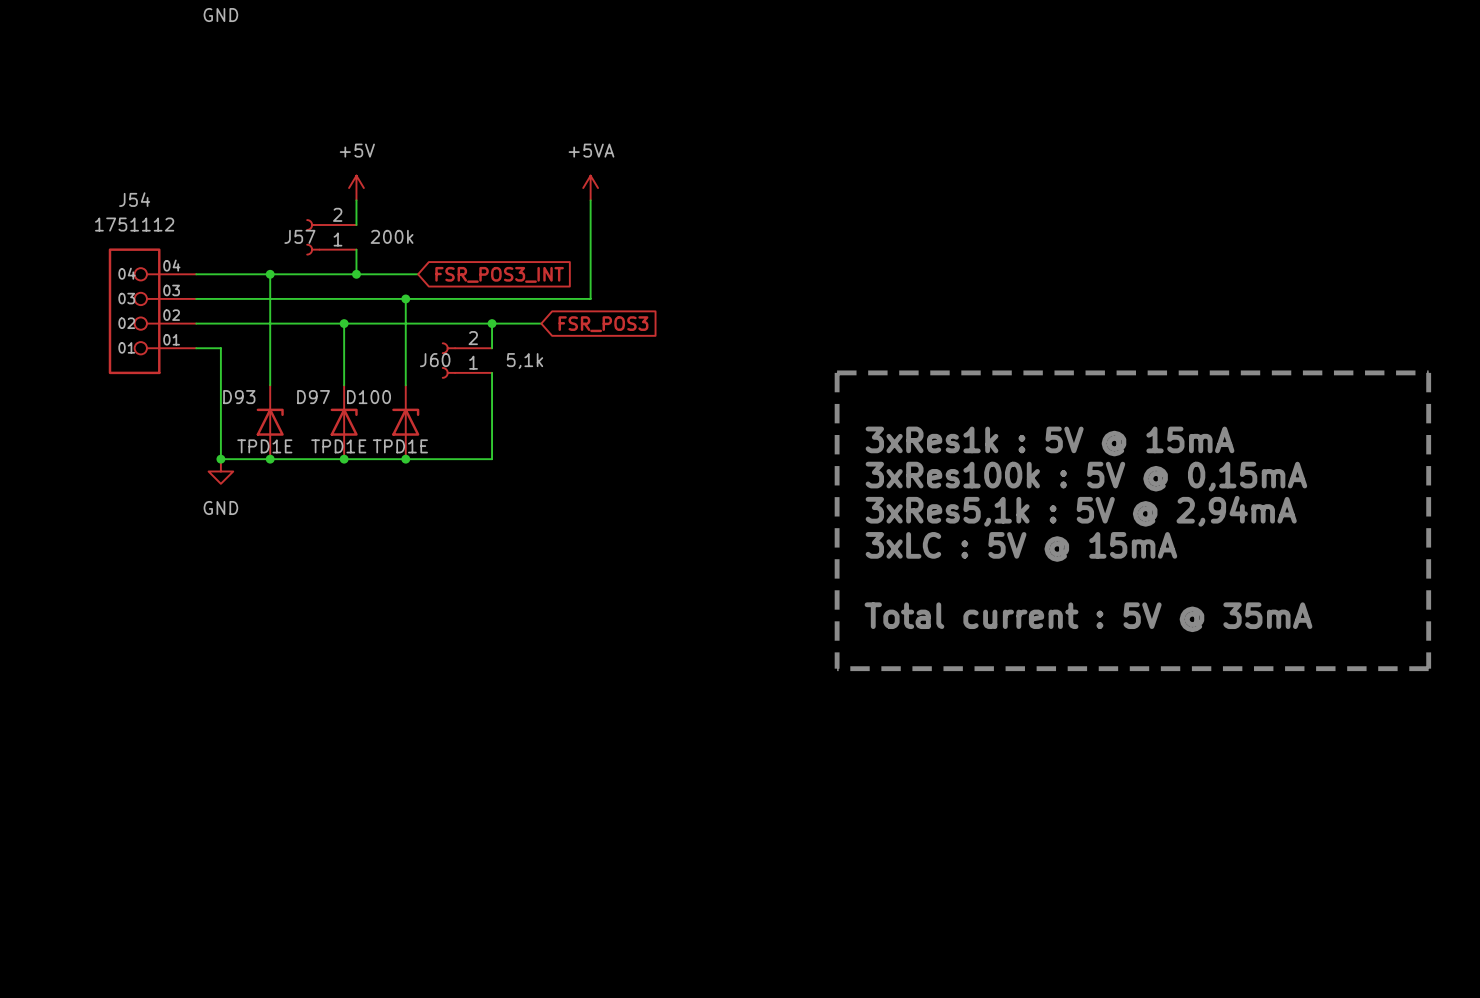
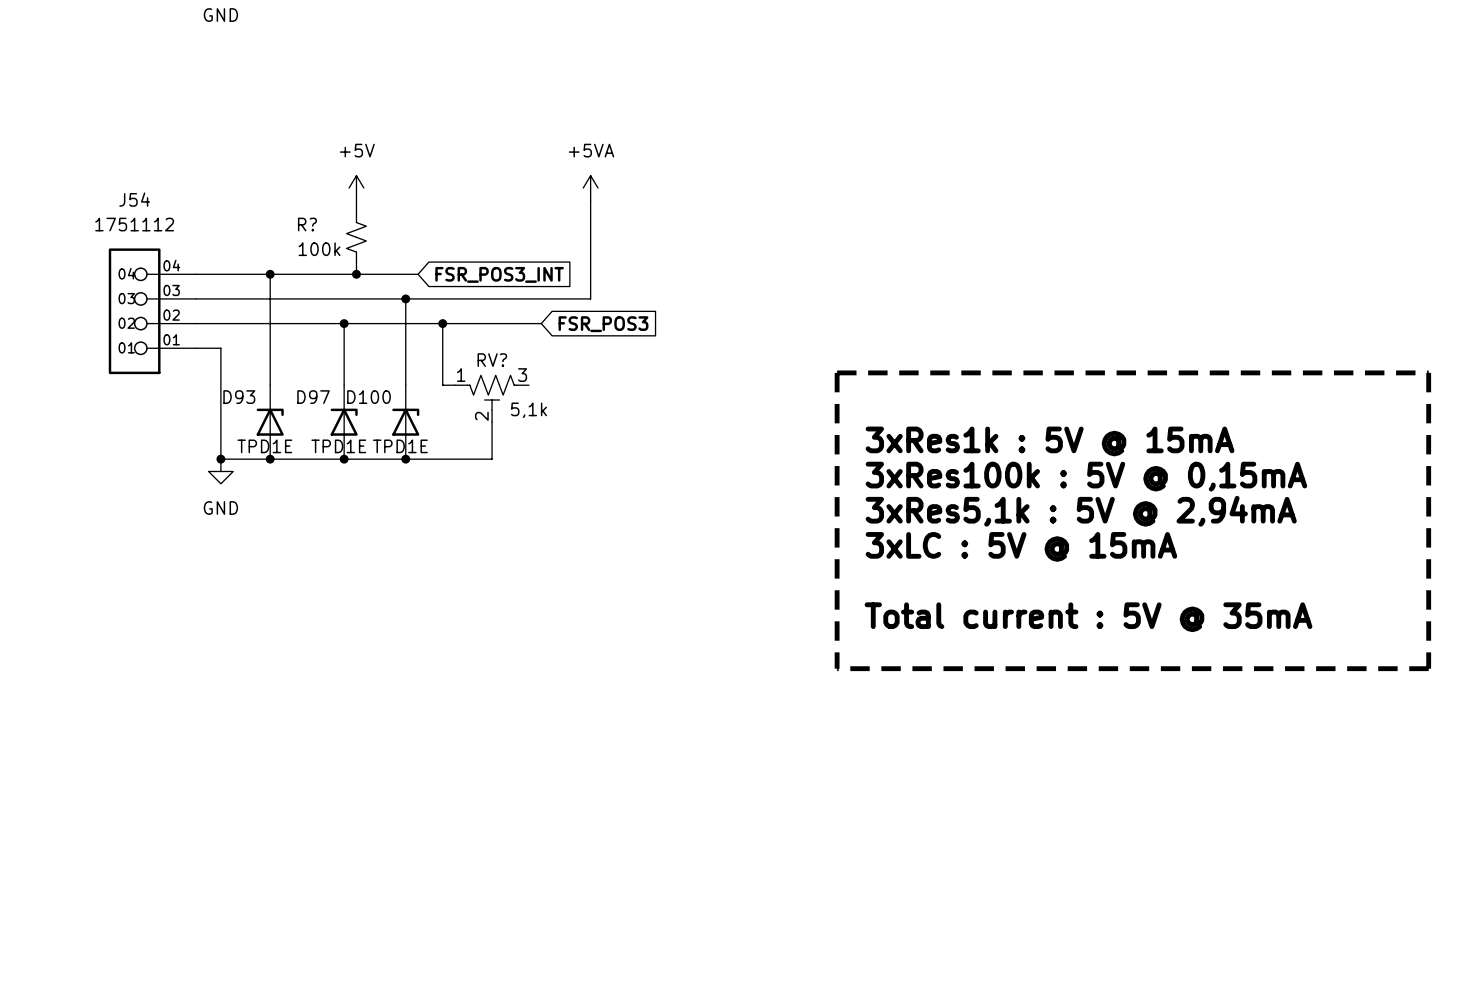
J57: 200k (331, 237) -> none
R?: none -> 100k (356, 237)
wire: none -> (442, 323) (442, 385) (455, 385)
wire: (492, 323) (492, 348) -> none
junction position: (492, 323) -> (442, 323)
J60: 5,1k (467, 360) -> none
RV?: none -> 5,1k (492, 398)

